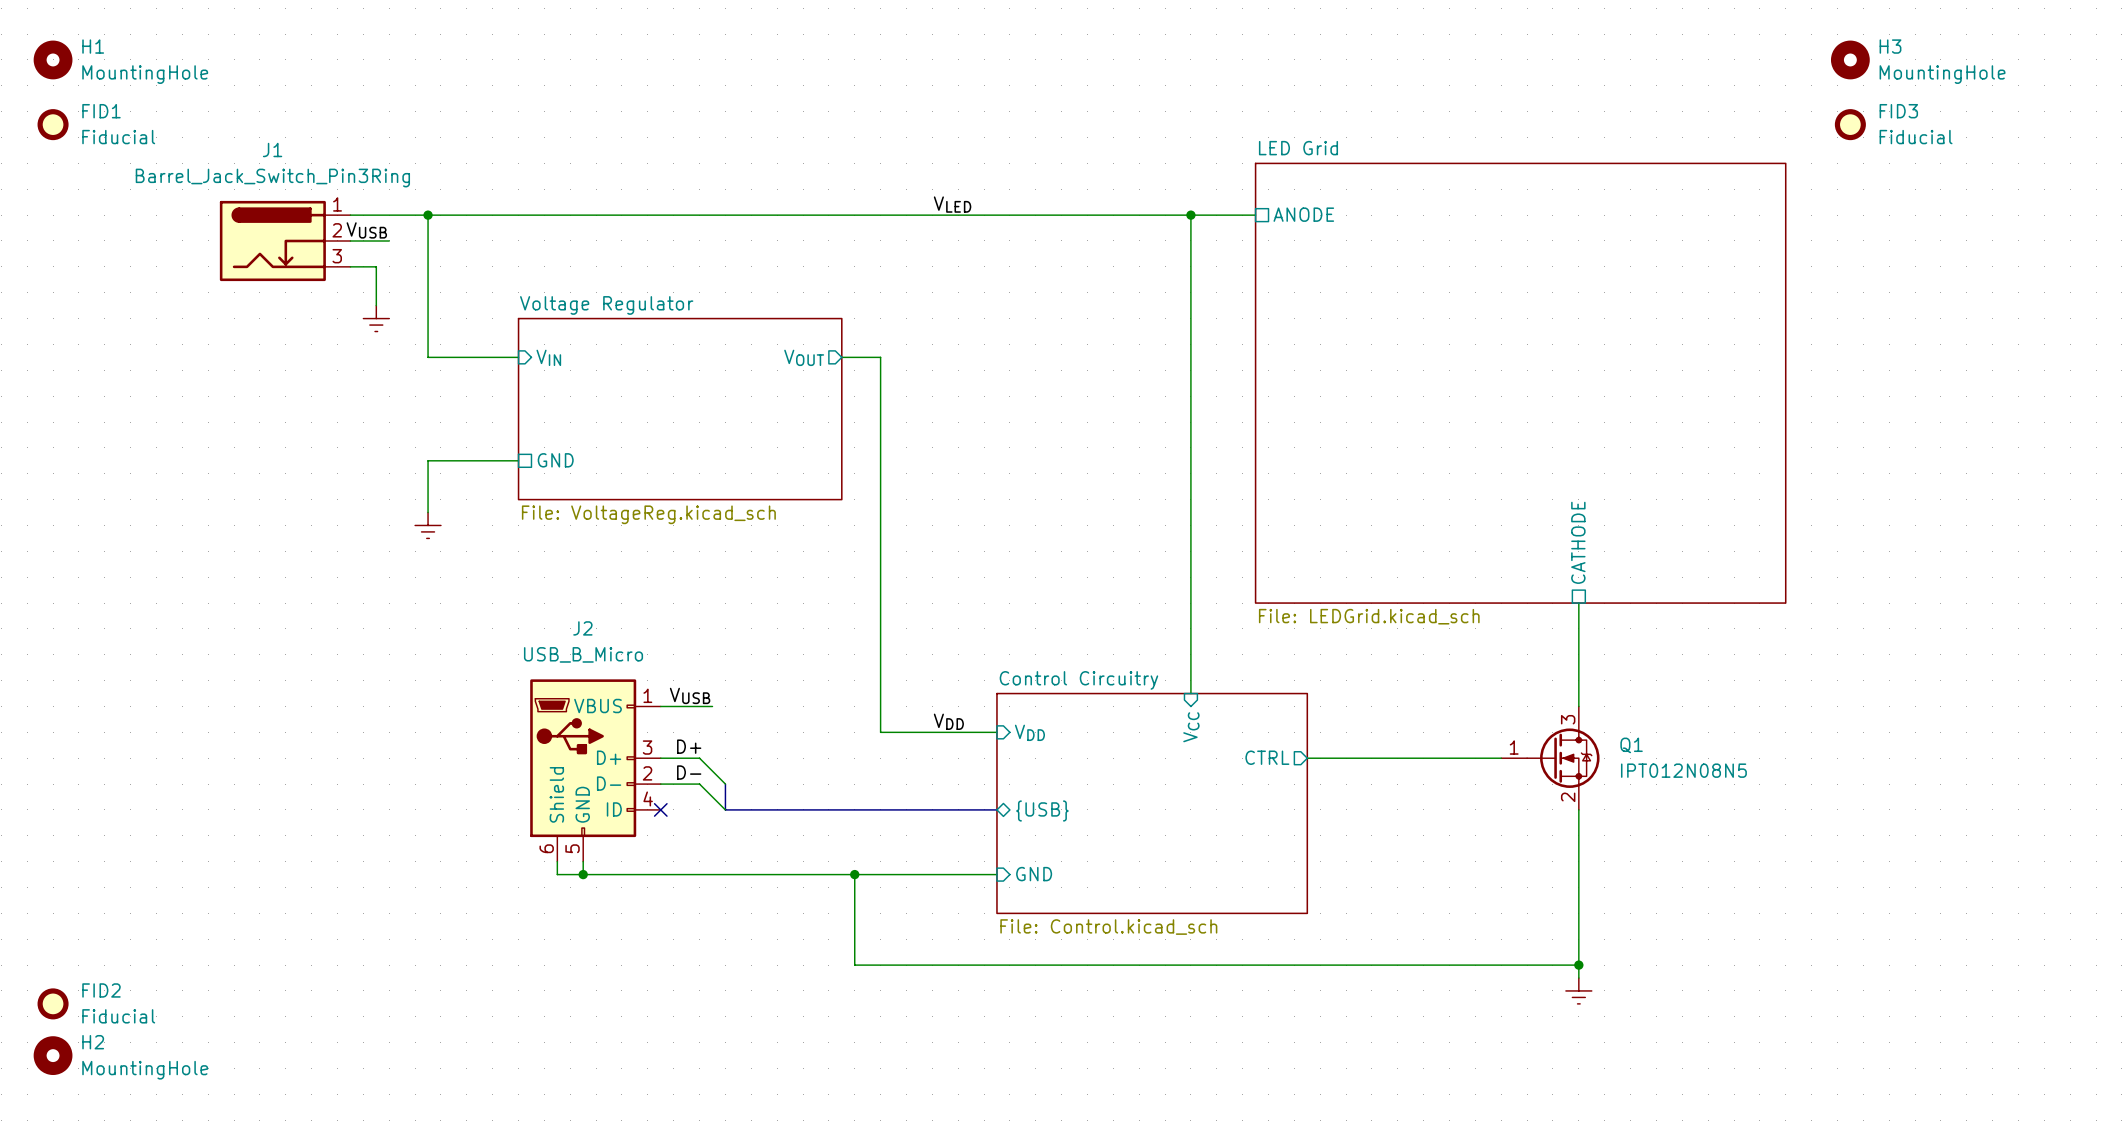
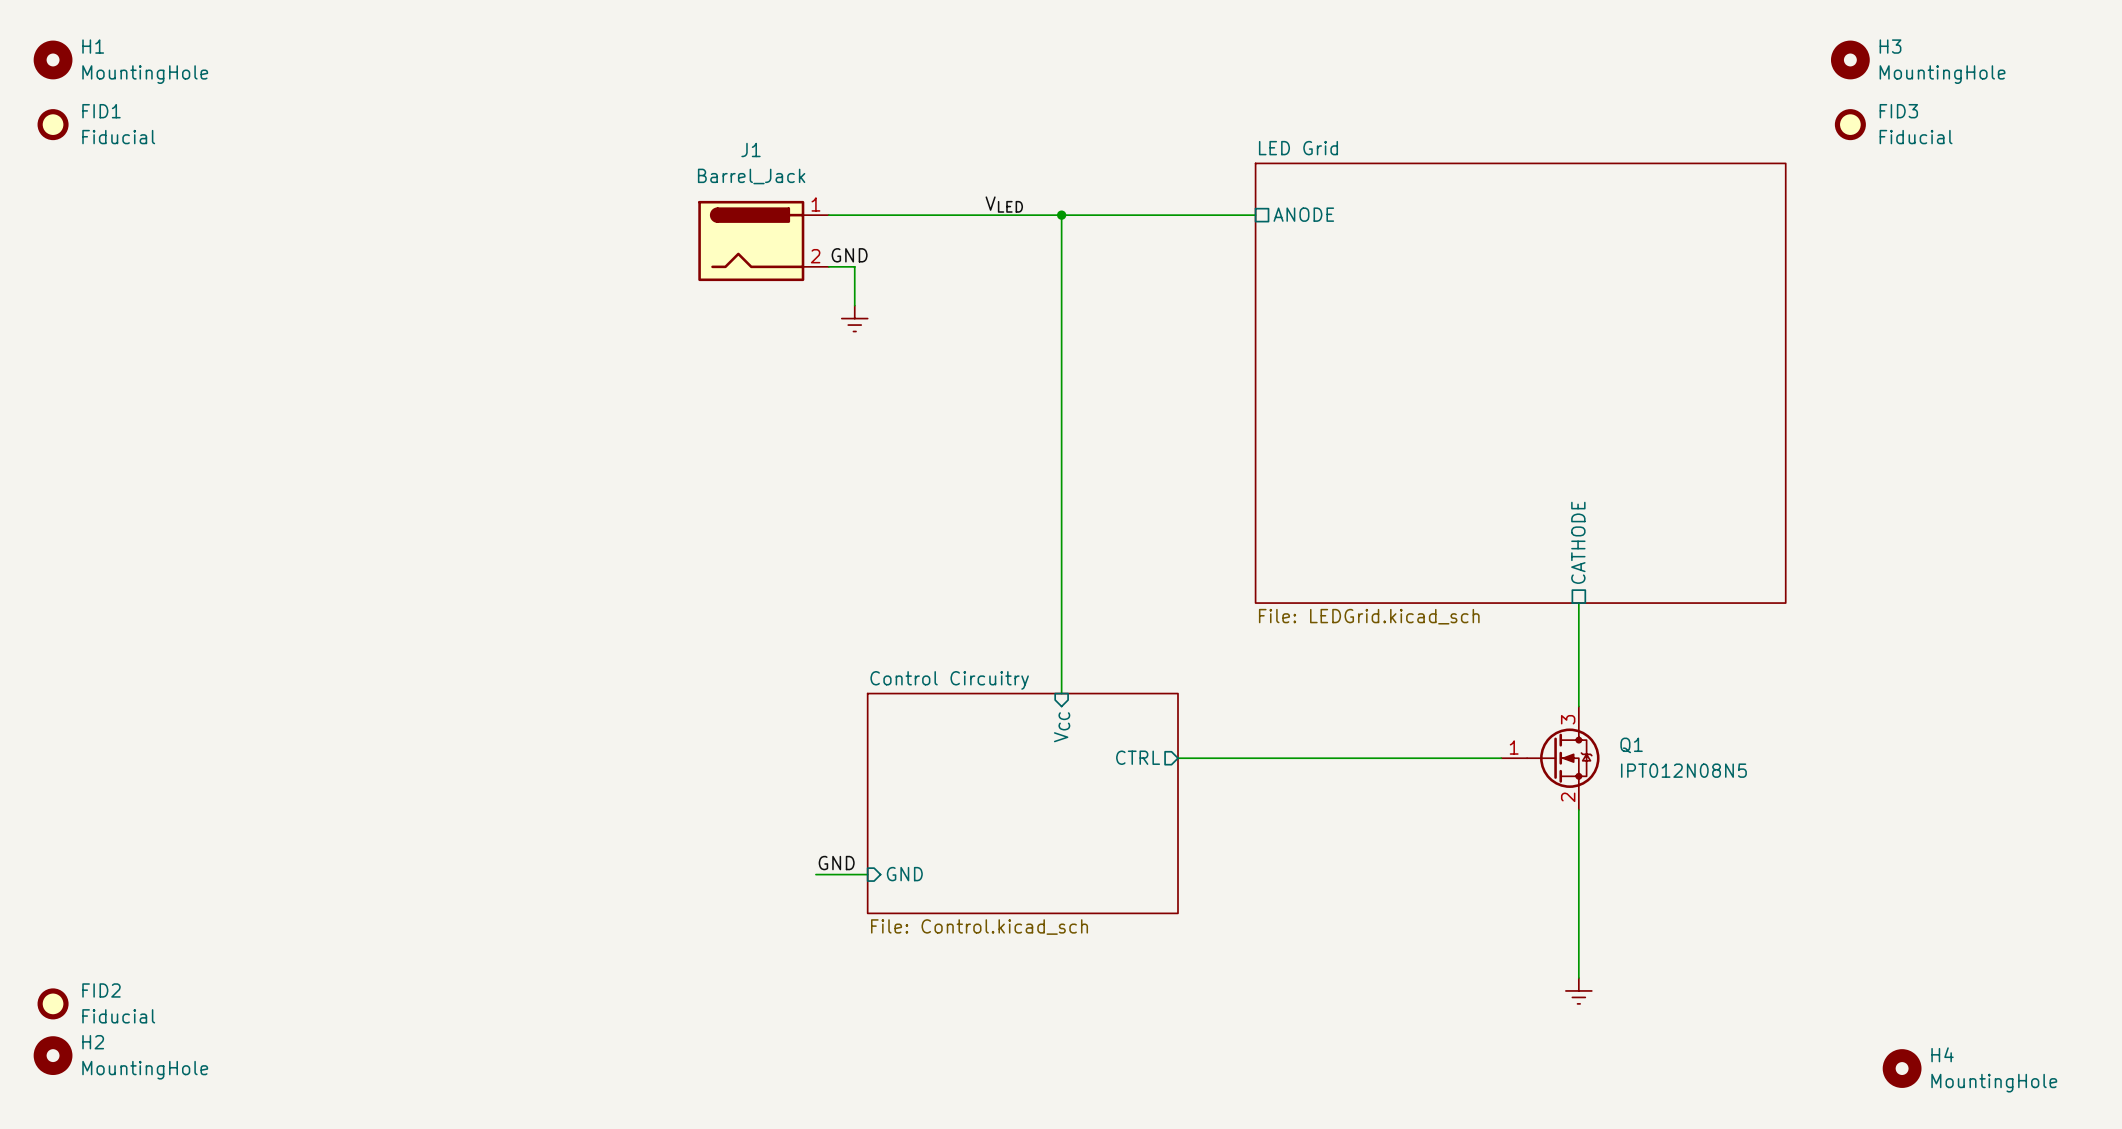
J1 value: Barrel_Jack_Switch_Pin3Ring (272, 178) -> Barrel_Jack (751, 176)
J1 symbol: [219, 200, 351, 282] -> [698, 200, 829, 282]
label position: VLED (952, 204) -> VLED (1004, 204)
wire: (350, 215) (828, 215) -> none
wire: (428, 215) (428, 357) (518, 357) -> none
junction: (428, 215) -> none
junction: none -> (1061, 215)
wire: (1190, 215) (1190, 693) -> (1061, 215) (1061, 693)
junction: (1190, 215) -> none
label: VUSB (366, 230) -> none
wire: (350, 240) (389, 240) -> none
label: none -> GND (849, 255)
wire: (350, 266) (376, 266) (376, 305) -> none
wire: none -> (828, 266) (854, 266) (854, 305)
power symbol: (376, 318) -> none
power symbol: none -> (854, 318)
sheet pin: VIN (548, 357) -> none
sheet pin: VOUT (804, 357) -> none
wire: (841, 357) (880, 357) (880, 732) (996, 732) -> none
sheet Voltage Regulator: File: VoltageReg.kicad_sch (680, 409) -> none
wire: (518, 460) (428, 460) (428, 512) -> none
sheet pin: GND (555, 460) -> none
power symbol: (428, 525) -> none
label: VUSB (690, 695) -> none
wire: (660, 706) (712, 706) -> none
label: VDD (948, 721) -> none
sheet pin position: VCC (1191, 727) -> VCC (1062, 727)
sheet pin: VDD (1029, 732) -> none
label: D+ (689, 746) -> none
sheet pin position: CTRL (1267, 757) -> CTRL (1138, 757)
wire: (660, 758) (699, 758) (725, 784) -> none
wire: none -> (1178, 758) (1307, 758)
J2: USB_B_Micro (595, 770) -> none
label: D- (689, 772) -> none
wire: (660, 784) (699, 784) (725, 809) -> none
bus: (725, 784) (725, 809) (996, 809) -> none
sheet Control Circuitry position: (1152, 803) -> (1022, 803)
no-connect mark: (660, 809) -> none
sheet pin: {USB} (1042, 810) -> none
wire: (557, 861) (557, 874) (815, 874) -> none
wire: (583, 861) (583, 874) -> none
label: none -> GND (836, 863)
junction: (583, 874) -> none
wire: (854, 874) (854, 965) (1578, 965) -> none
junction: (854, 874) -> none
wire: (867, 874) (996, 874) -> none
sheet pin position: GND (1034, 874) -> GND (904, 874)
junction: (1578, 965) -> none
H4: none -> MountingHole (1902, 1068)

